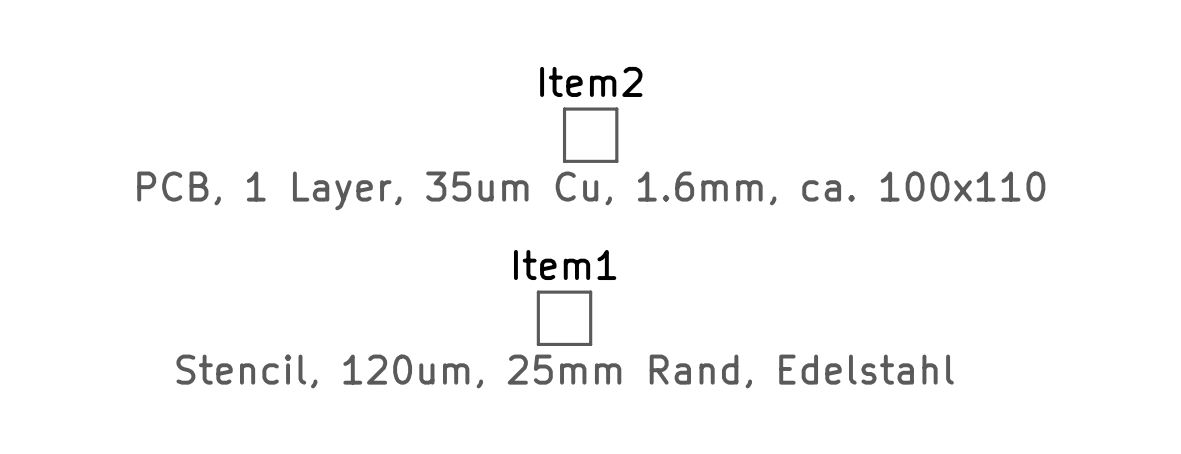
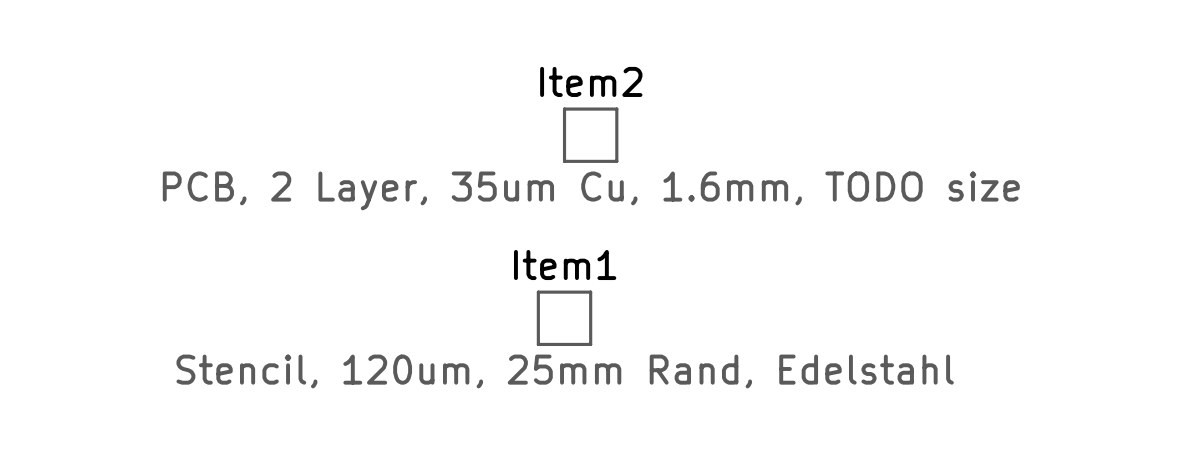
Item2 value: PCB, 1 Layer, 35um Cu, 1.6mm, ca. 100x110 (591, 190) -> PCB, 2 Layer, 35um Cu, 1.6mm, TODO size (591, 190)

